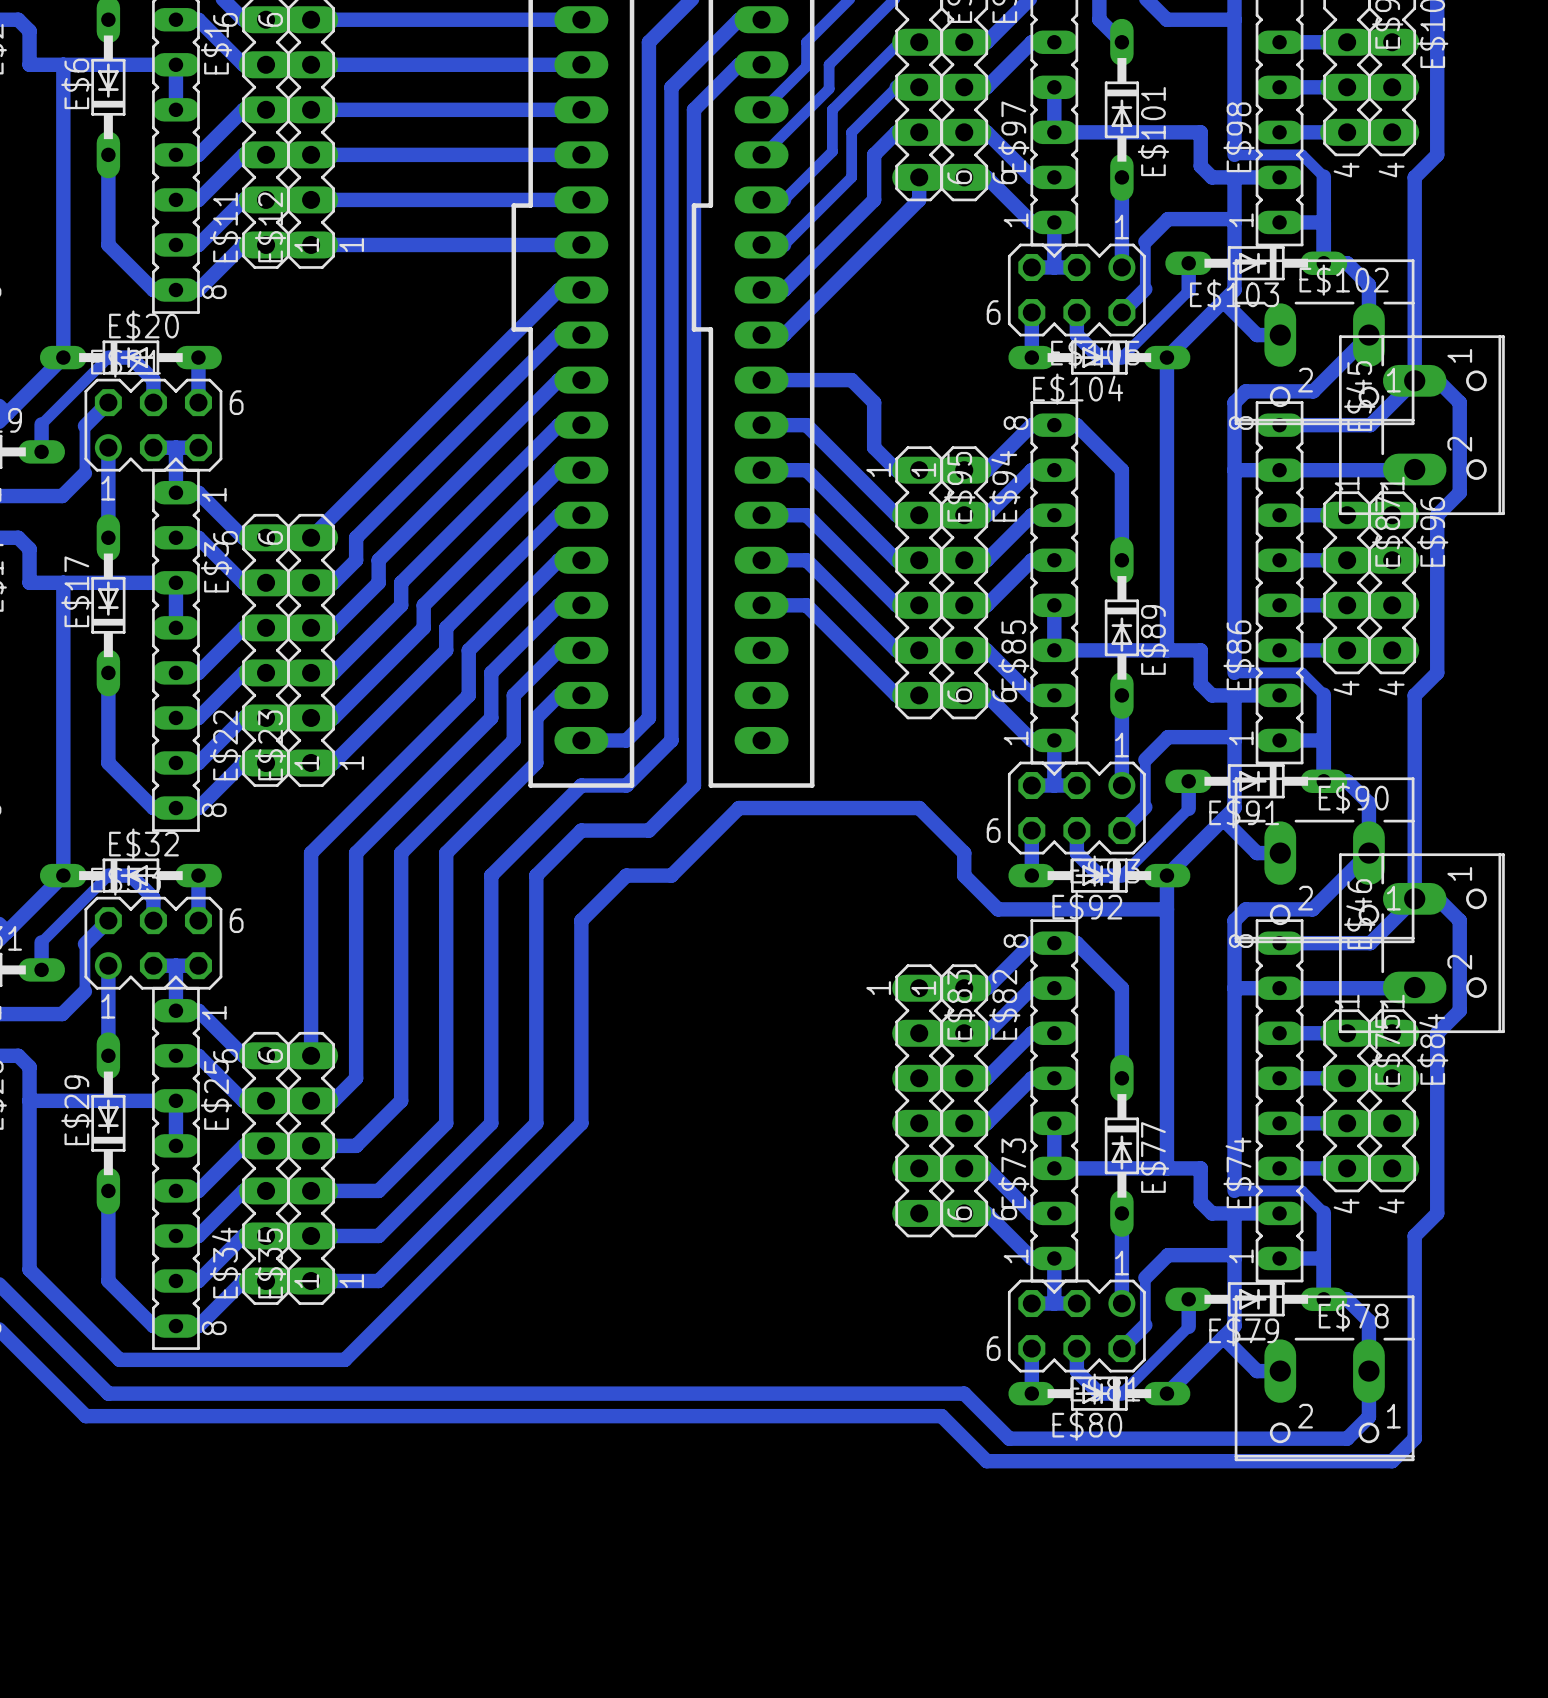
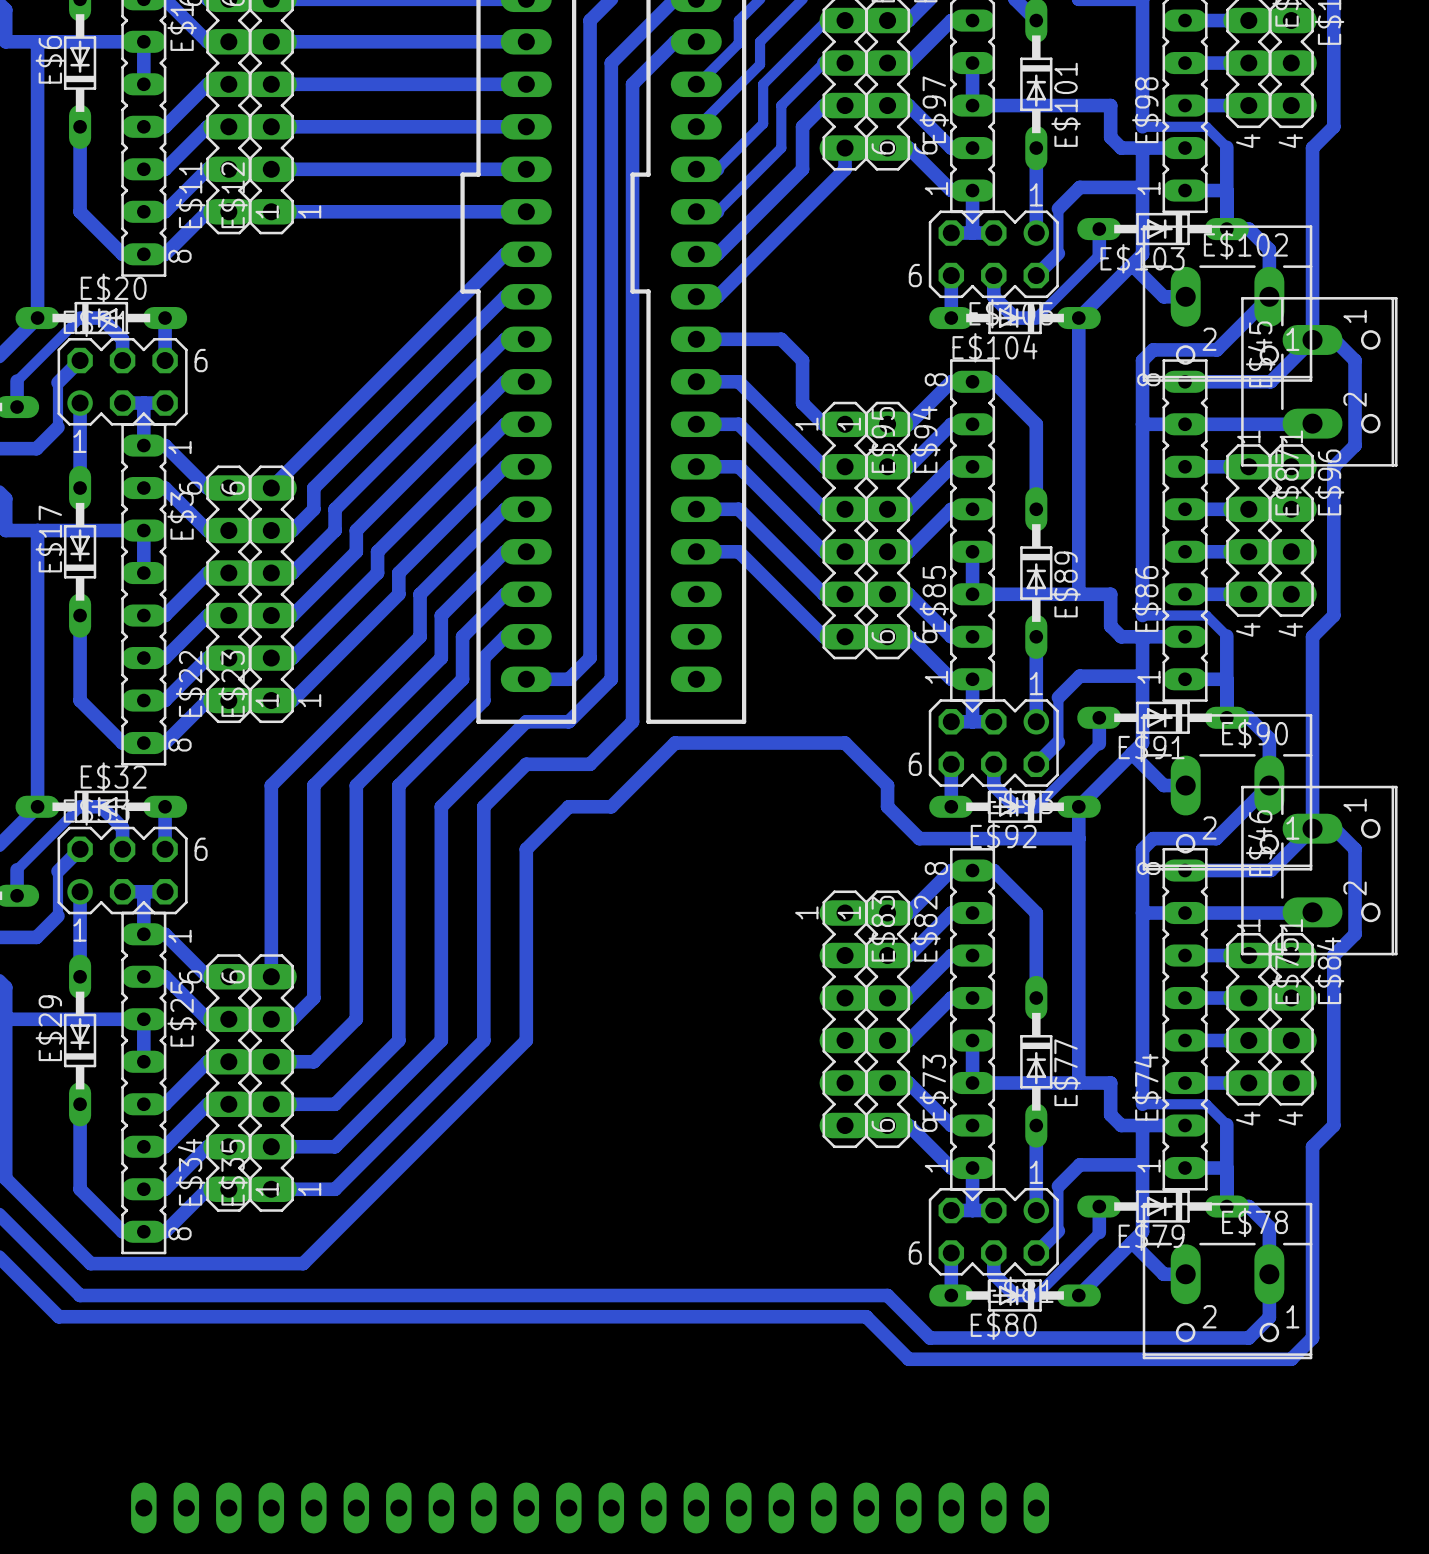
part: none -> (590, 1508)

